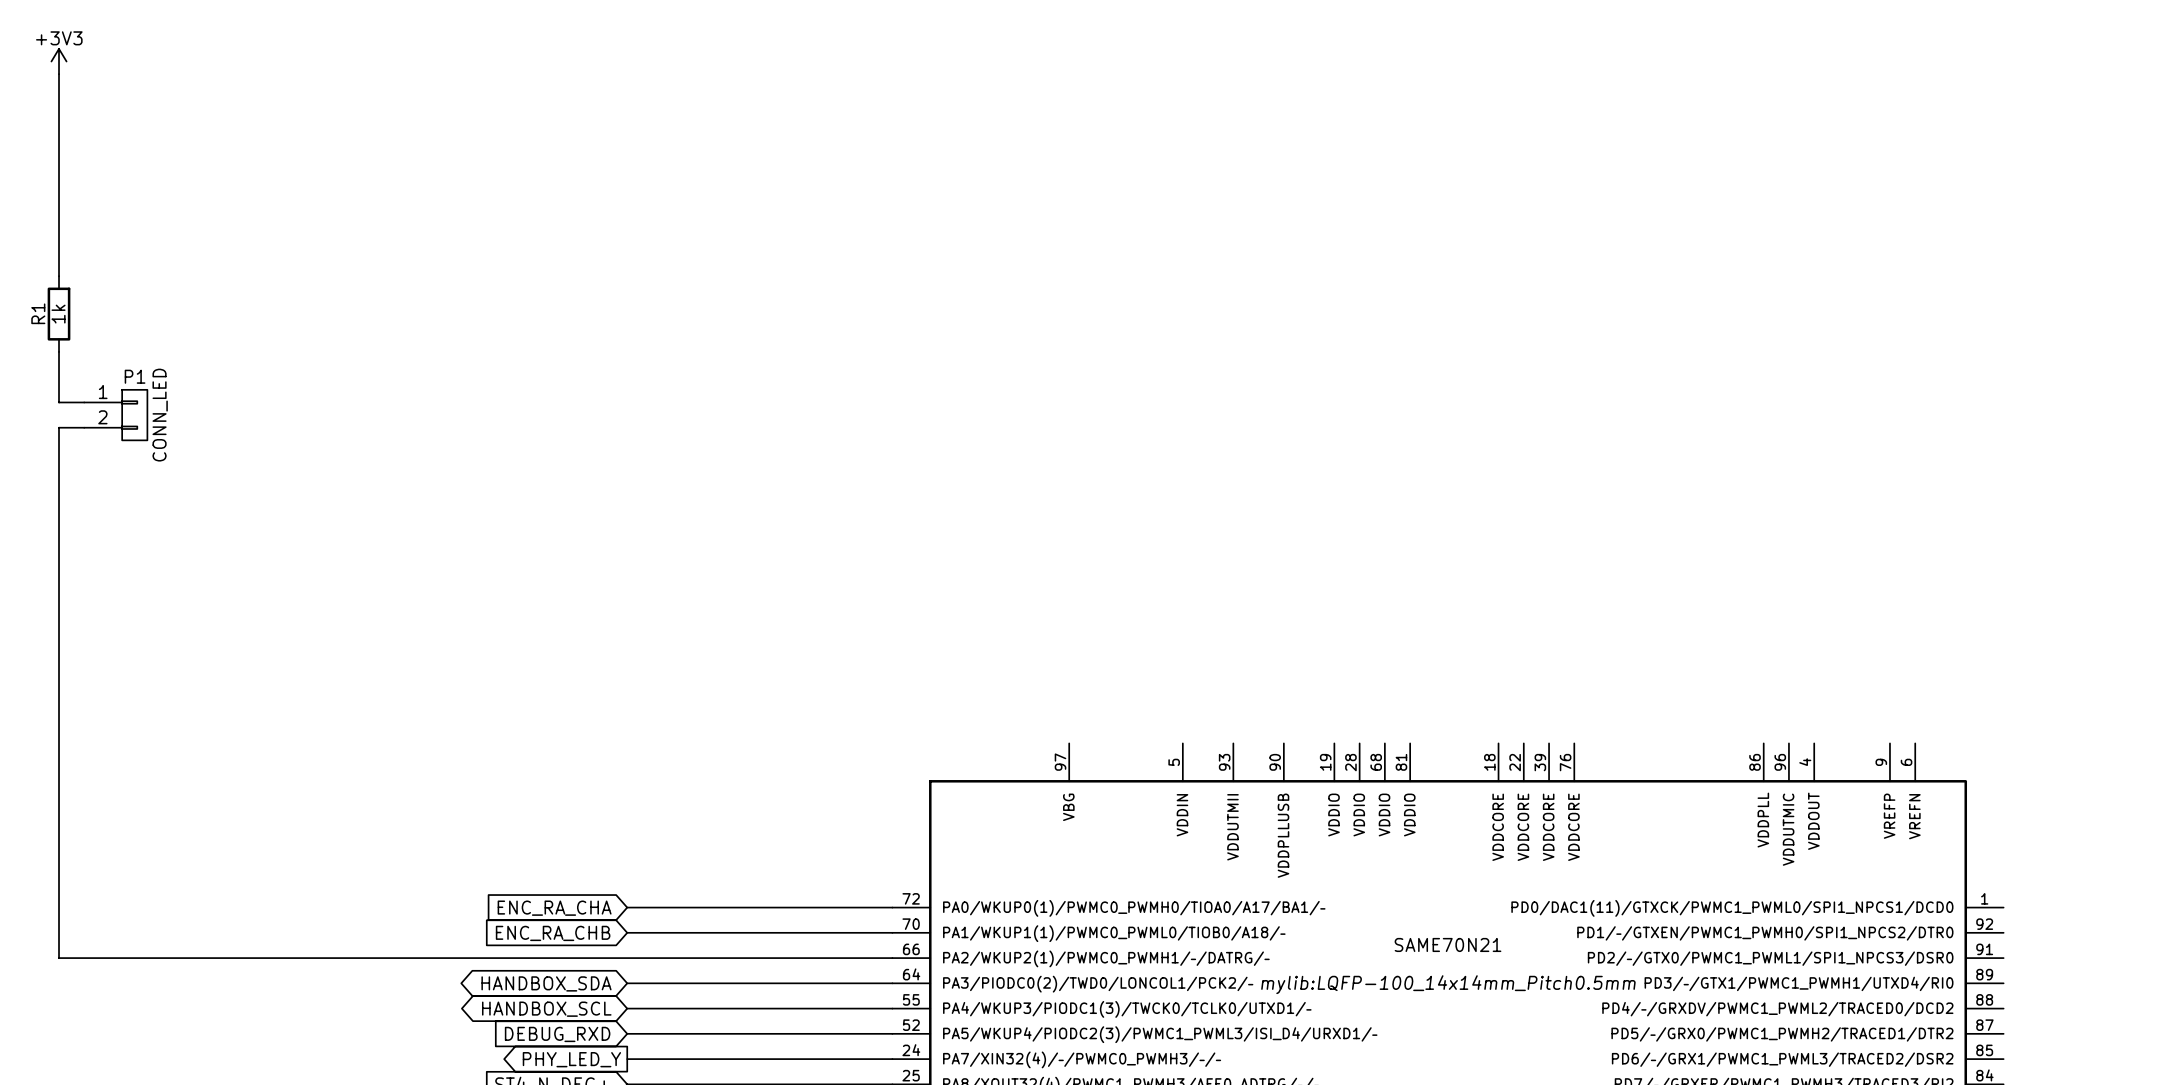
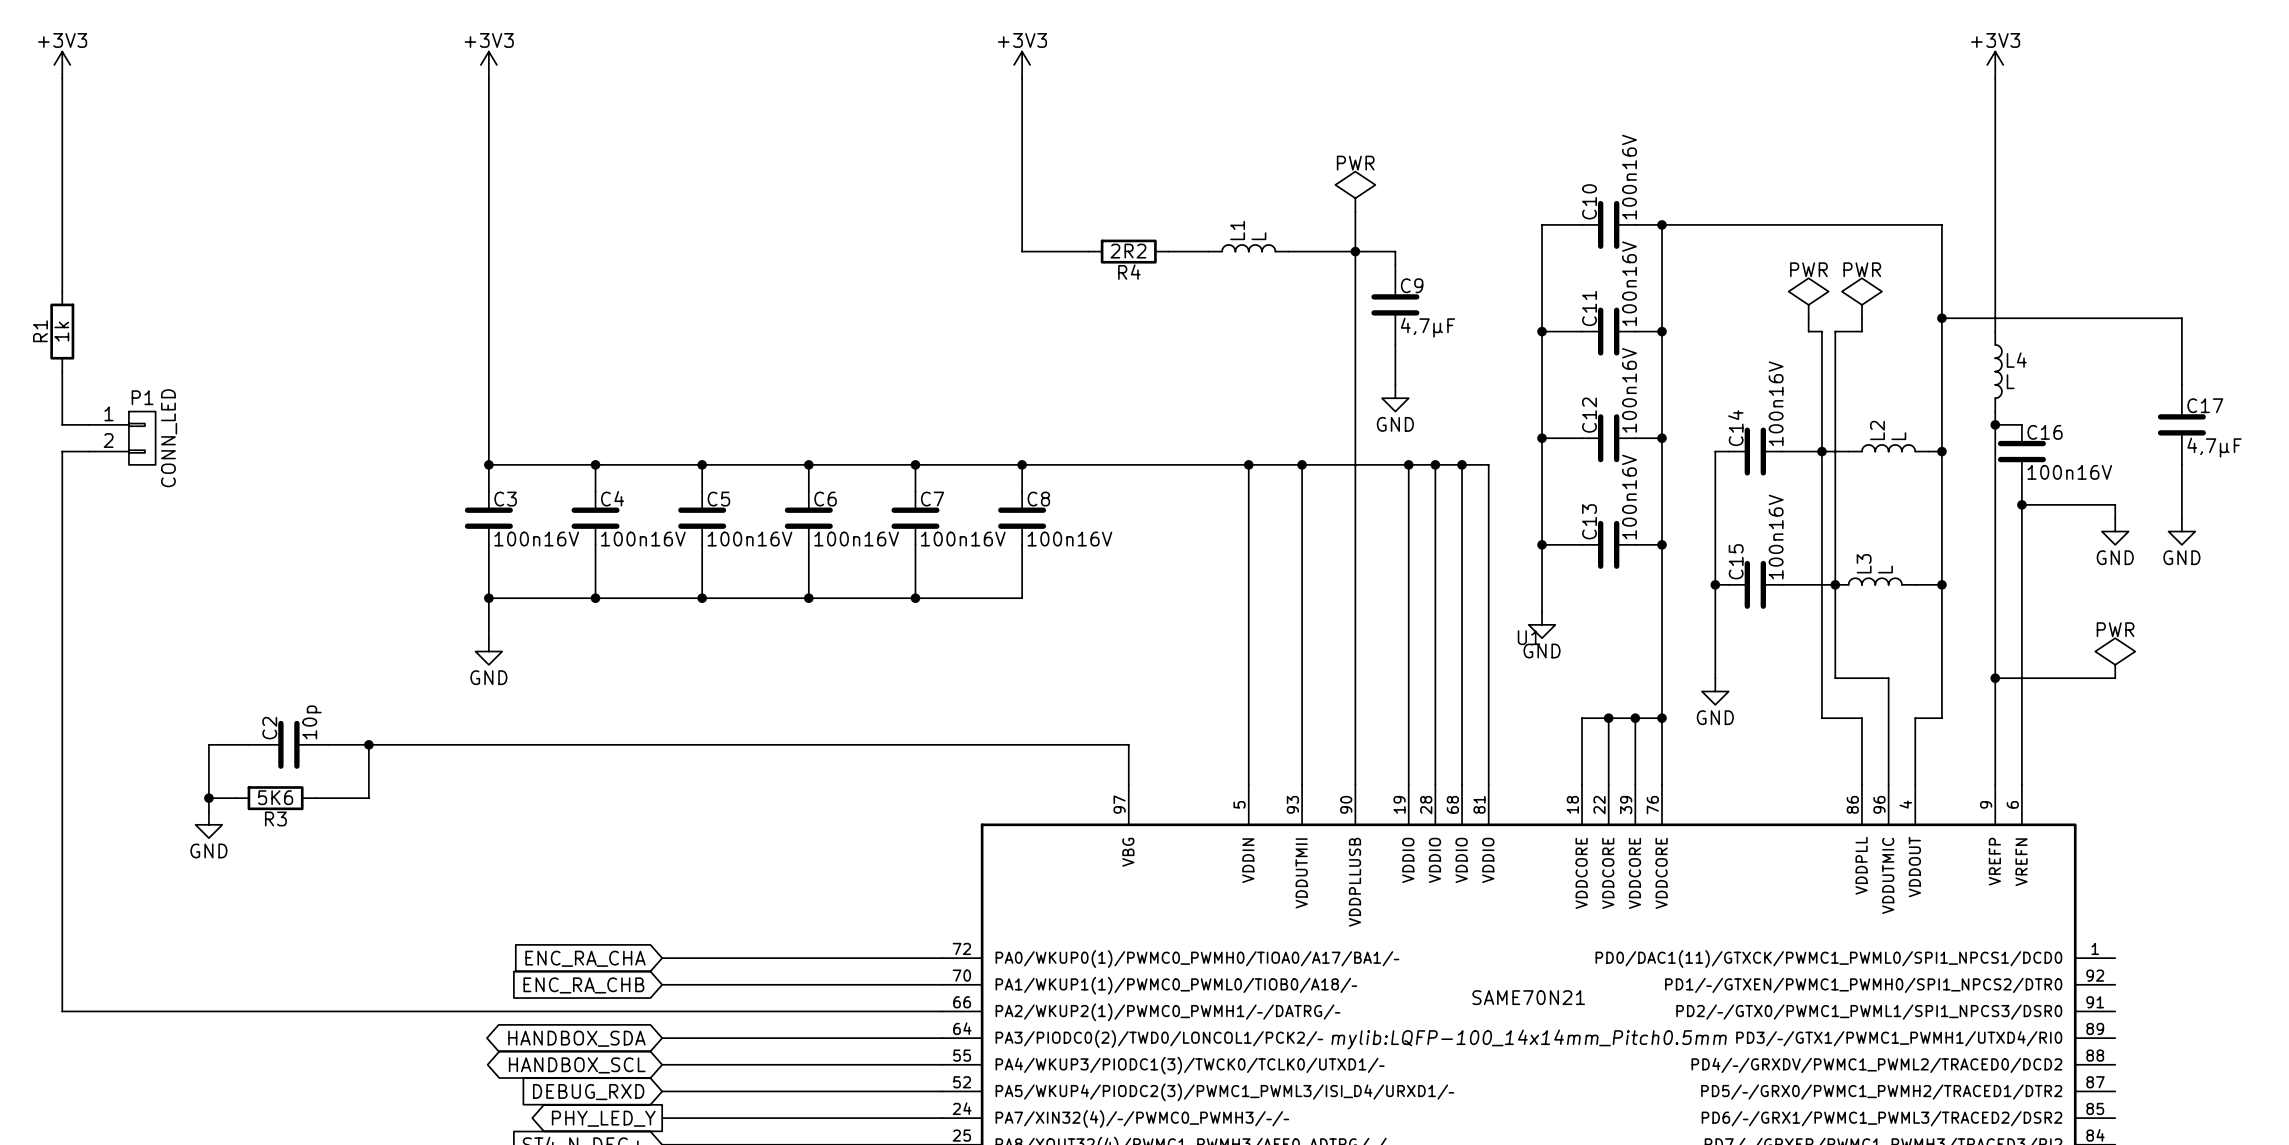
power symbol: none -> +3V3 (488, 64)
power symbol: none -> +3V3 (1022, 64)
power symbol: none -> +3V3 (1995, 64)
wire: none -> (488, 78) (488, 491)
wire: none -> (1022, 78) (1022, 251) (1088, 251)
wire: none -> (1995, 78) (1995, 331)
power symbol: none -> PWR (1355, 191)
wire: none -> (1355, 211) (1355, 784)
wire: none -> (1582, 224) (1542, 224) (1542, 611)
C10: none -> 100n16V (1608, 224)
wire: none -> (1635, 224) (1941, 224) (1941, 718) (1915, 718) (1915, 784)
wire: none -> (1662, 224) (1662, 784)
junction: none -> (1662, 224)
L1: none -> L (1248, 248)
R4: none -> 2R2 (1128, 251)
wire: none -> (1168, 251) (1208, 251)
wire: none -> (1288, 251) (1395, 251) (1395, 264)
junction: none -> (1355, 251)
power symbol: none -> PWR (1808, 298)
power symbol: none -> PWR (1861, 298)
C9: none -> 4,7µF (1395, 304)
wire: none -> (1808, 318) (1808, 331) (1821, 331) (1821, 718) (1861, 718) (1861, 784)
wire: none -> (1861, 318) (1861, 331) (1835, 331) (1835, 678) (1888, 678) (1888, 784)
wire: none -> (1941, 318) (2181, 318) (2181, 384)
junction: none -> (1941, 318)
wire: none -> (1542, 331) (1582, 331)
junction: none -> (1542, 331)
C11: none -> 100n16V (1608, 331)
wire: none -> (1635, 331) (1662, 331)
junction: none -> (1662, 331)
wire: none -> (1395, 344) (1395, 384)
L4: none -> L (1998, 371)
power symbol: none -> GND (1395, 398)
wire: none -> (1995, 411) (1995, 784)
wire: none -> (1995, 424) (2021, 424)
junction: none -> (1995, 424)
C17: none -> 4,7µF (2181, 424)
wire: none -> (1542, 438) (1582, 438)
junction: none -> (1542, 438)
C12: none -> 100n16V (1608, 438)
wire: none -> (1635, 438) (1662, 438)
junction: none -> (1662, 438)
L2: none -> L (1888, 448)
wire: none -> (1728, 451) (1715, 451) (1715, 678)
C14: none -> 100n16V (1755, 451)
wire: none -> (1781, 451) (1848, 451)
junction: none -> (1821, 451)
wire: none -> (1928, 451) (1941, 451)
junction: none -> (1941, 451)
C16: none -> 100n16V (2021, 451)
wire: none -> (488, 464) (1488, 464) (1488, 784)
junction: none -> (488, 464)
wire: none -> (595, 464) (595, 491)
junction: none -> (595, 464)
wire: none -> (702, 464) (702, 491)
junction: none -> (702, 464)
wire: none -> (808, 464) (808, 491)
junction: none -> (808, 464)
wire: none -> (915, 464) (915, 491)
junction: none -> (915, 464)
wire: none -> (1022, 464) (1022, 491)
junction: none -> (1022, 464)
wire: none -> (1248, 464) (1248, 784)
junction: none -> (1248, 464)
wire: none -> (1302, 464) (1302, 784)
junction: none -> (1302, 464)
wire: none -> (1408, 464) (1408, 784)
junction: none -> (1408, 464)
wire: none -> (1435, 464) (1435, 784)
junction: none -> (1435, 464)
wire: none -> (1462, 464) (1462, 784)
junction: none -> (1462, 464)
wire: none -> (2181, 464) (2181, 518)
wire: none -> (2021, 478) (2021, 784)
wire: none -> (2021, 504) (2115, 504) (2115, 518)
junction: none -> (2021, 504)
C3: none -> 100n16V (488, 518)
C4: none -> 100n16V (595, 518)
C5: none -> 100n16V (702, 518)
C6: none -> 100n16V (808, 518)
C7: none -> 100n16V (915, 518)
C8: none -> 100n16V (1022, 518)
power symbol: none -> GND (2115, 531)
power symbol: none -> GND (2181, 531)
wire: none -> (488, 544) (488, 638)
wire: none -> (595, 544) (595, 598)
wire: none -> (702, 544) (702, 598)
wire: none -> (808, 544) (808, 598)
wire: none -> (915, 544) (915, 598)
wire: none -> (1022, 544) (1022, 598) (488, 598)
wire: none -> (1542, 544) (1582, 544)
junction: none -> (1542, 544)
C13: none -> 100n16V (1608, 544)
wire: none -> (1635, 544) (1662, 544)
junction: none -> (1662, 544)
L3: none -> L (1875, 581)
wire: none -> (1715, 584) (1728, 584)
junction: none -> (1715, 584)
C15: none -> 100n16V (1755, 584)
wire: none -> (1781, 584) (1835, 584)
junction: none -> (1835, 584)
wire: none -> (1915, 584) (1941, 584)
junction: none -> (1941, 584)
junction: none -> (488, 598)
junction: none -> (595, 598)
junction: none -> (702, 598)
junction: none -> (808, 598)
junction: none -> (915, 598)
power symbol: none -> GND (1542, 624)
U1 name: none -> U1 (1529, 637)
power symbol: none -> GND (488, 651)
power symbol: none -> PWR (2115, 658)
wire: none -> (1995, 678) (2115, 678)
junction: none -> (1995, 678)
power symbol: none -> GND (1715, 691)
wire: none -> (1608, 718) (1608, 784)
junction: none -> (1608, 718)
wire: none -> (1635, 718) (1635, 784)
junction: none -> (1635, 718)
wire: none -> (1662, 718) (1582, 718) (1582, 784)
junction: none -> (1662, 718)
wire: none -> (248, 744) (208, 744) (208, 811)
C2: none -> 10p (288, 744)
wire: none -> (328, 744) (1128, 744) (1128, 784)
wire: none -> (368, 744) (368, 798) (315, 798)
junction: none -> (368, 744)
wire: none -> (208, 798) (235, 798)
junction: none -> (208, 798)
R3: none -> 5K6 (275, 798)
power symbol: none -> GND (208, 824)

